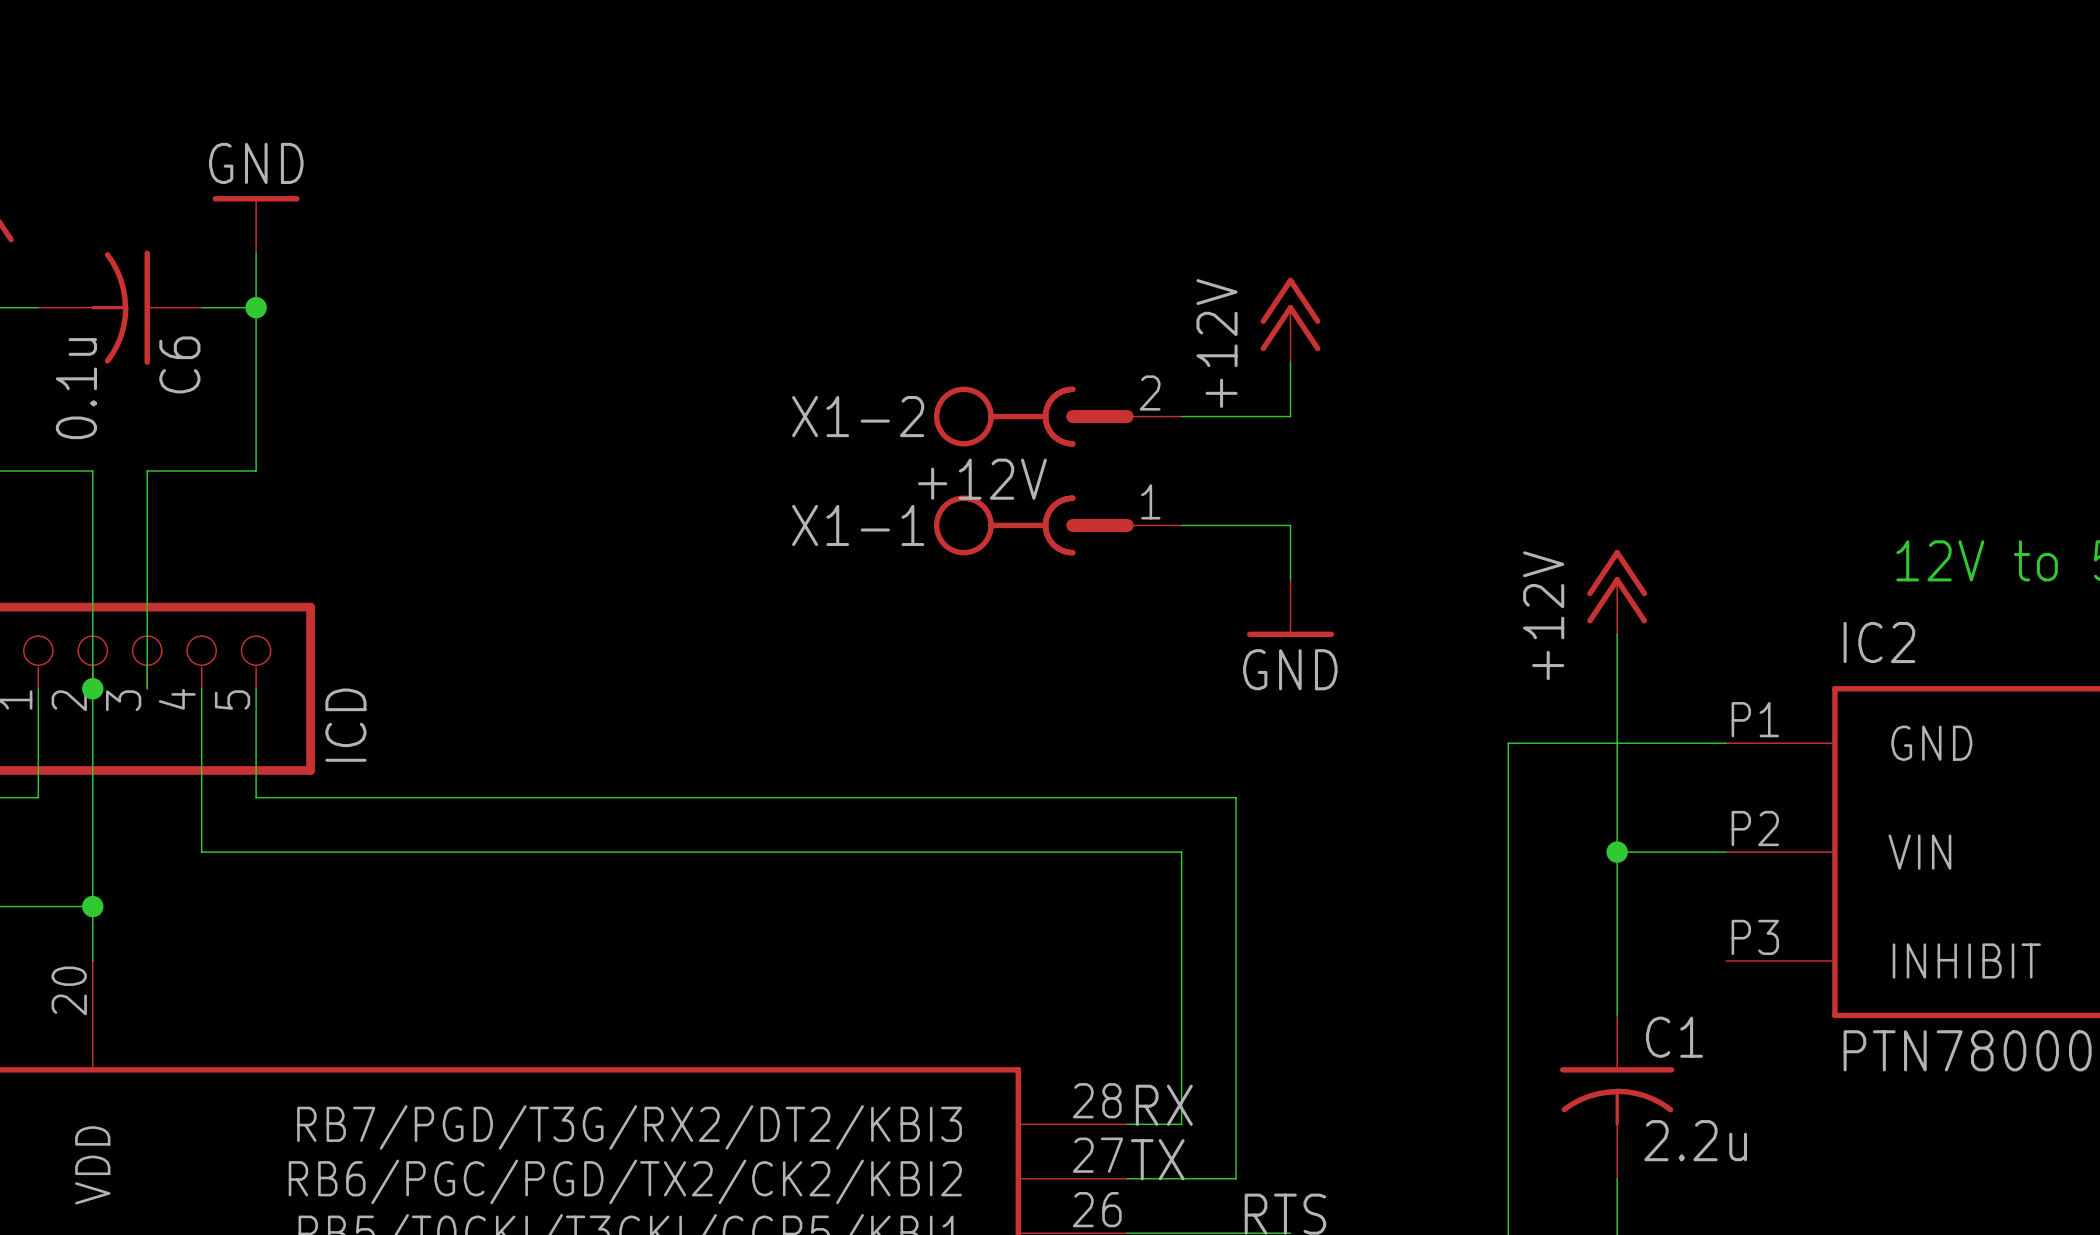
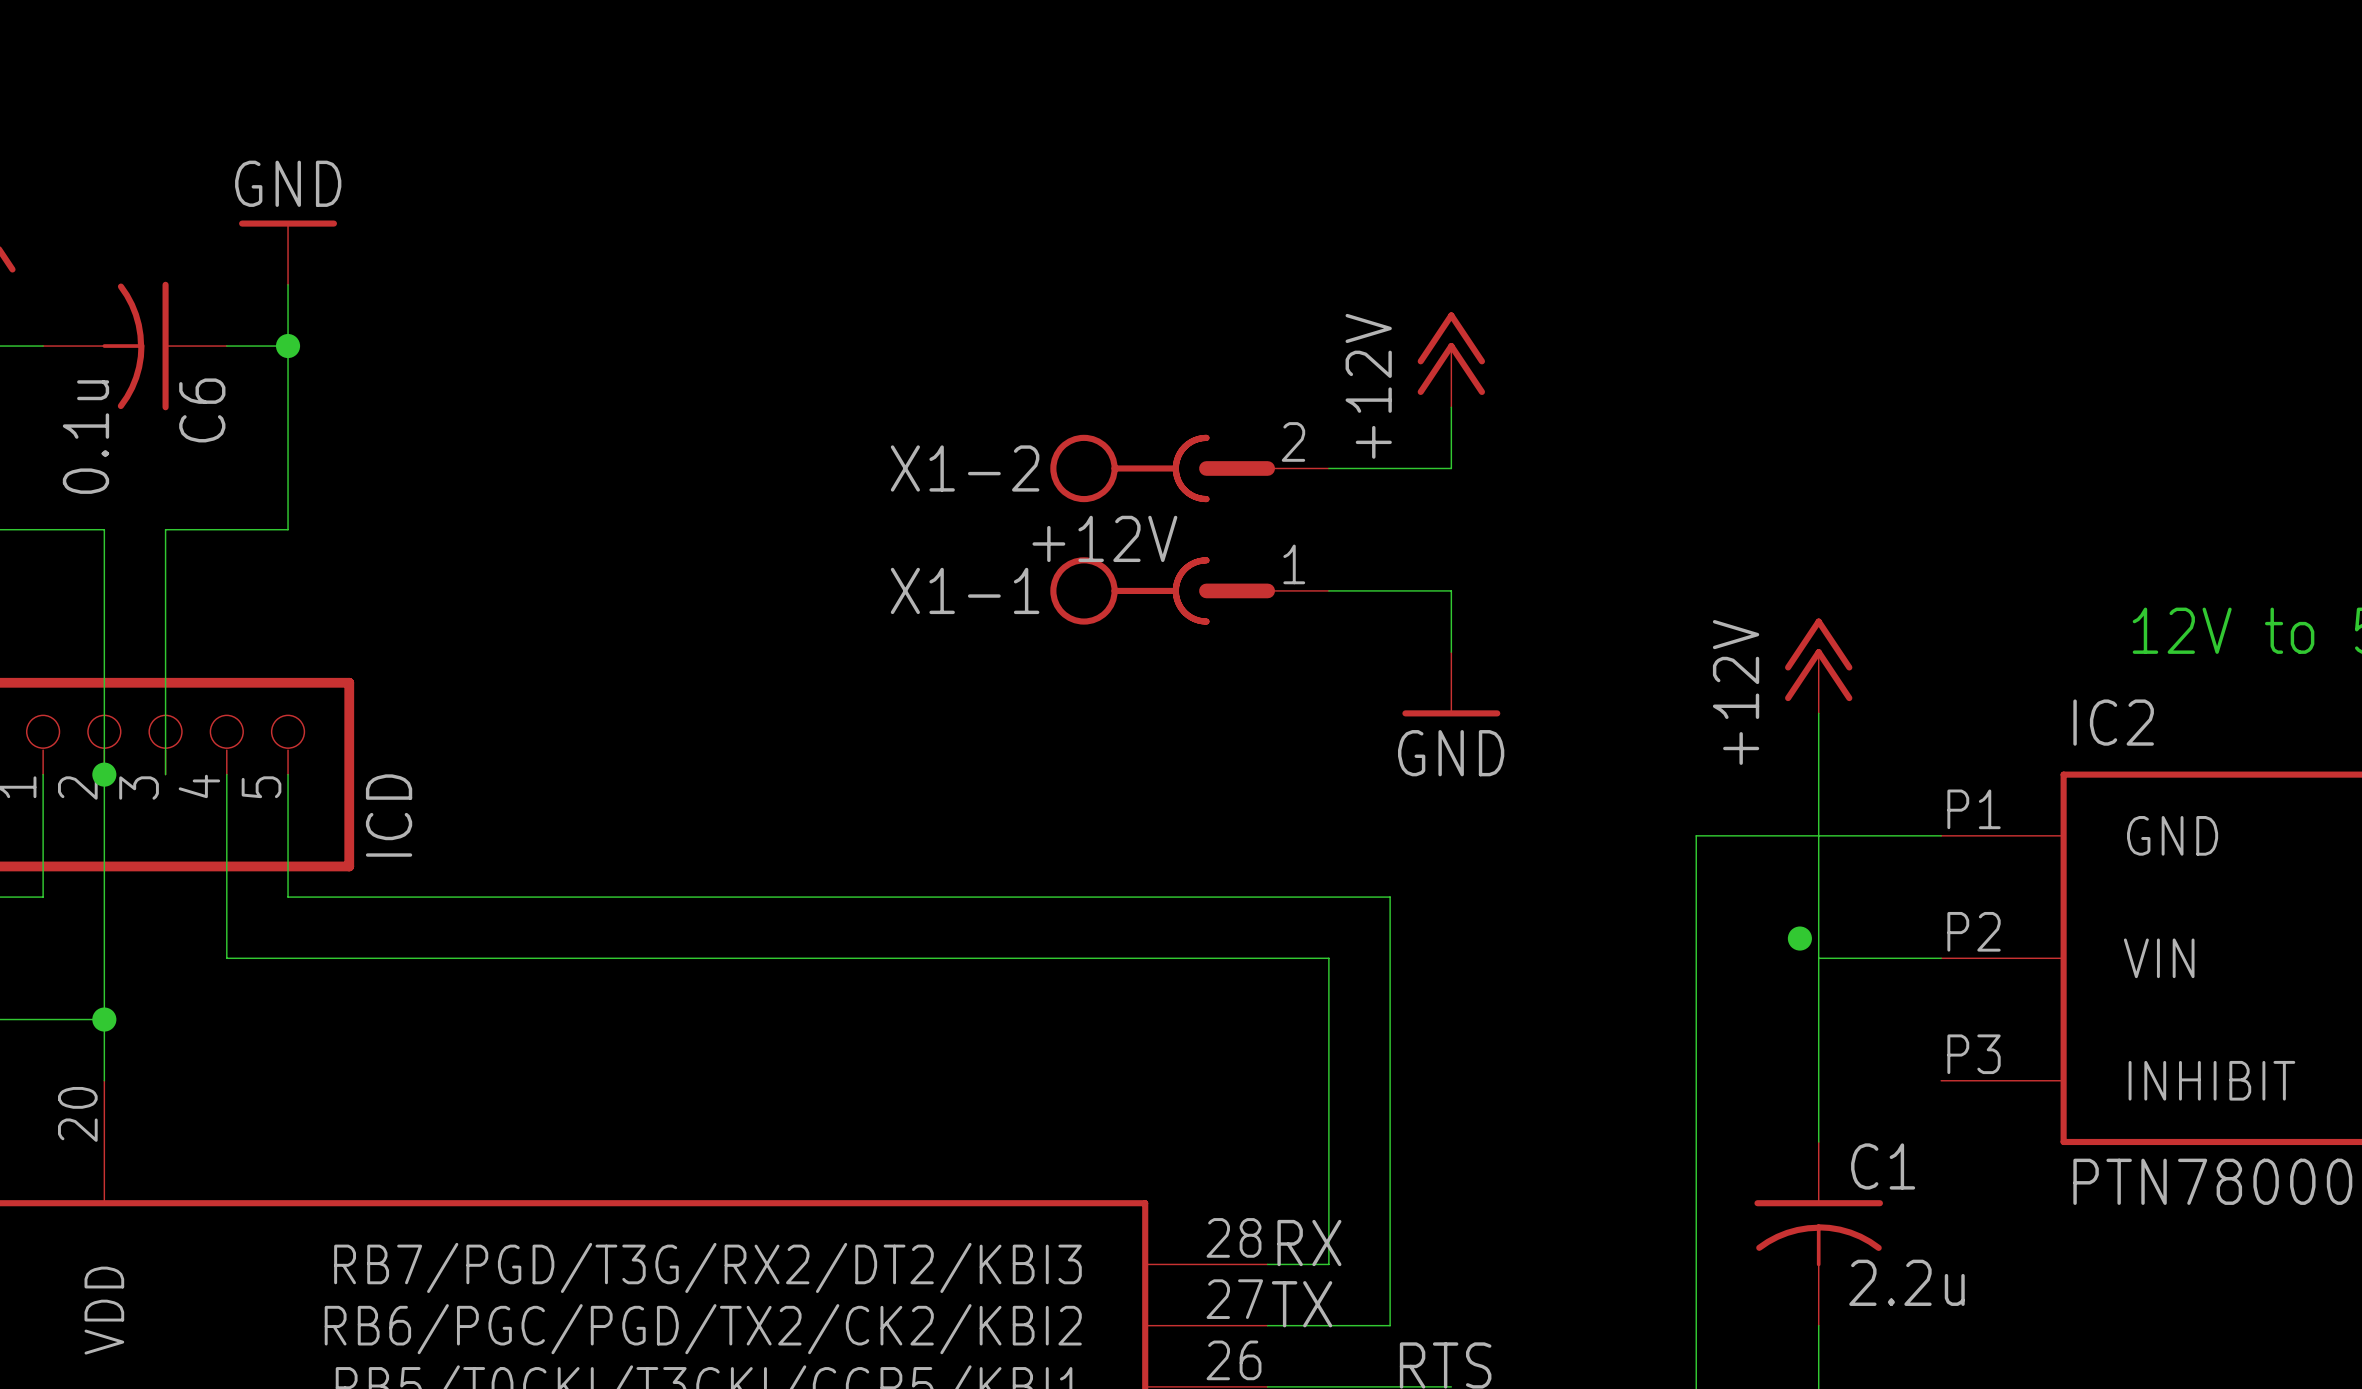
junction position: (1617, 852) -> (1799, 938)

